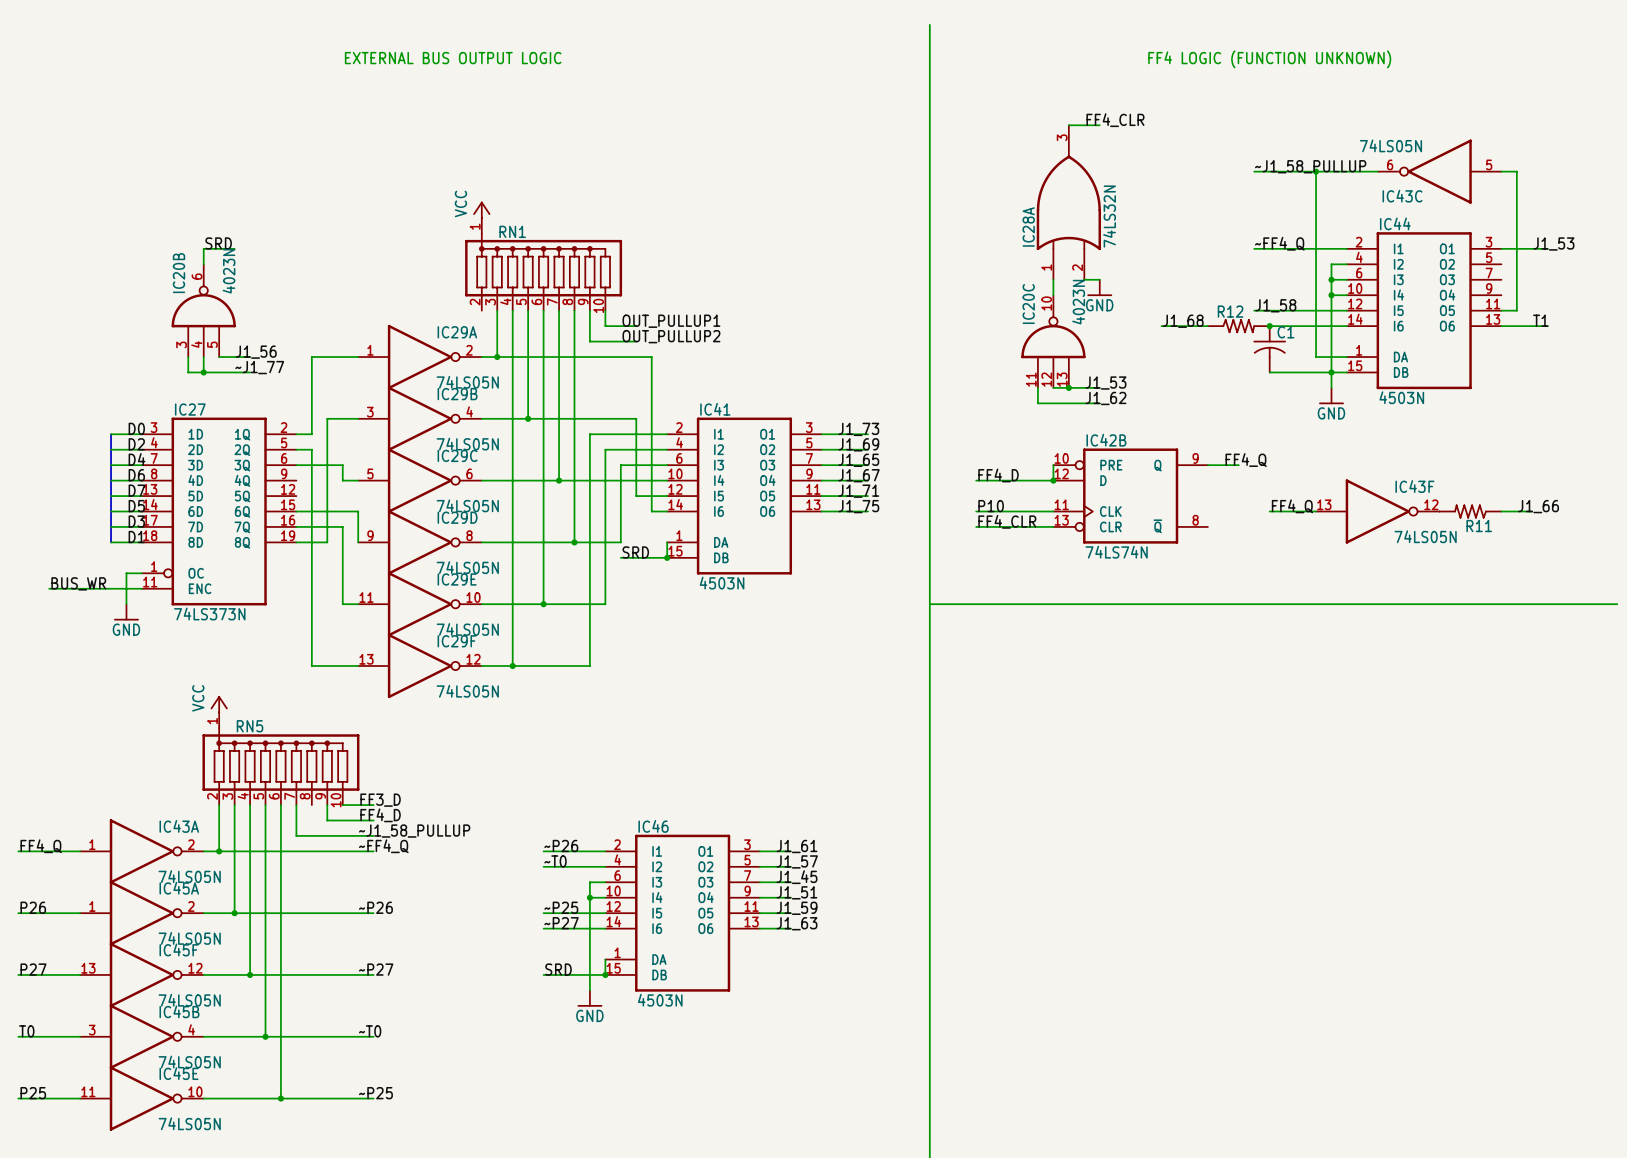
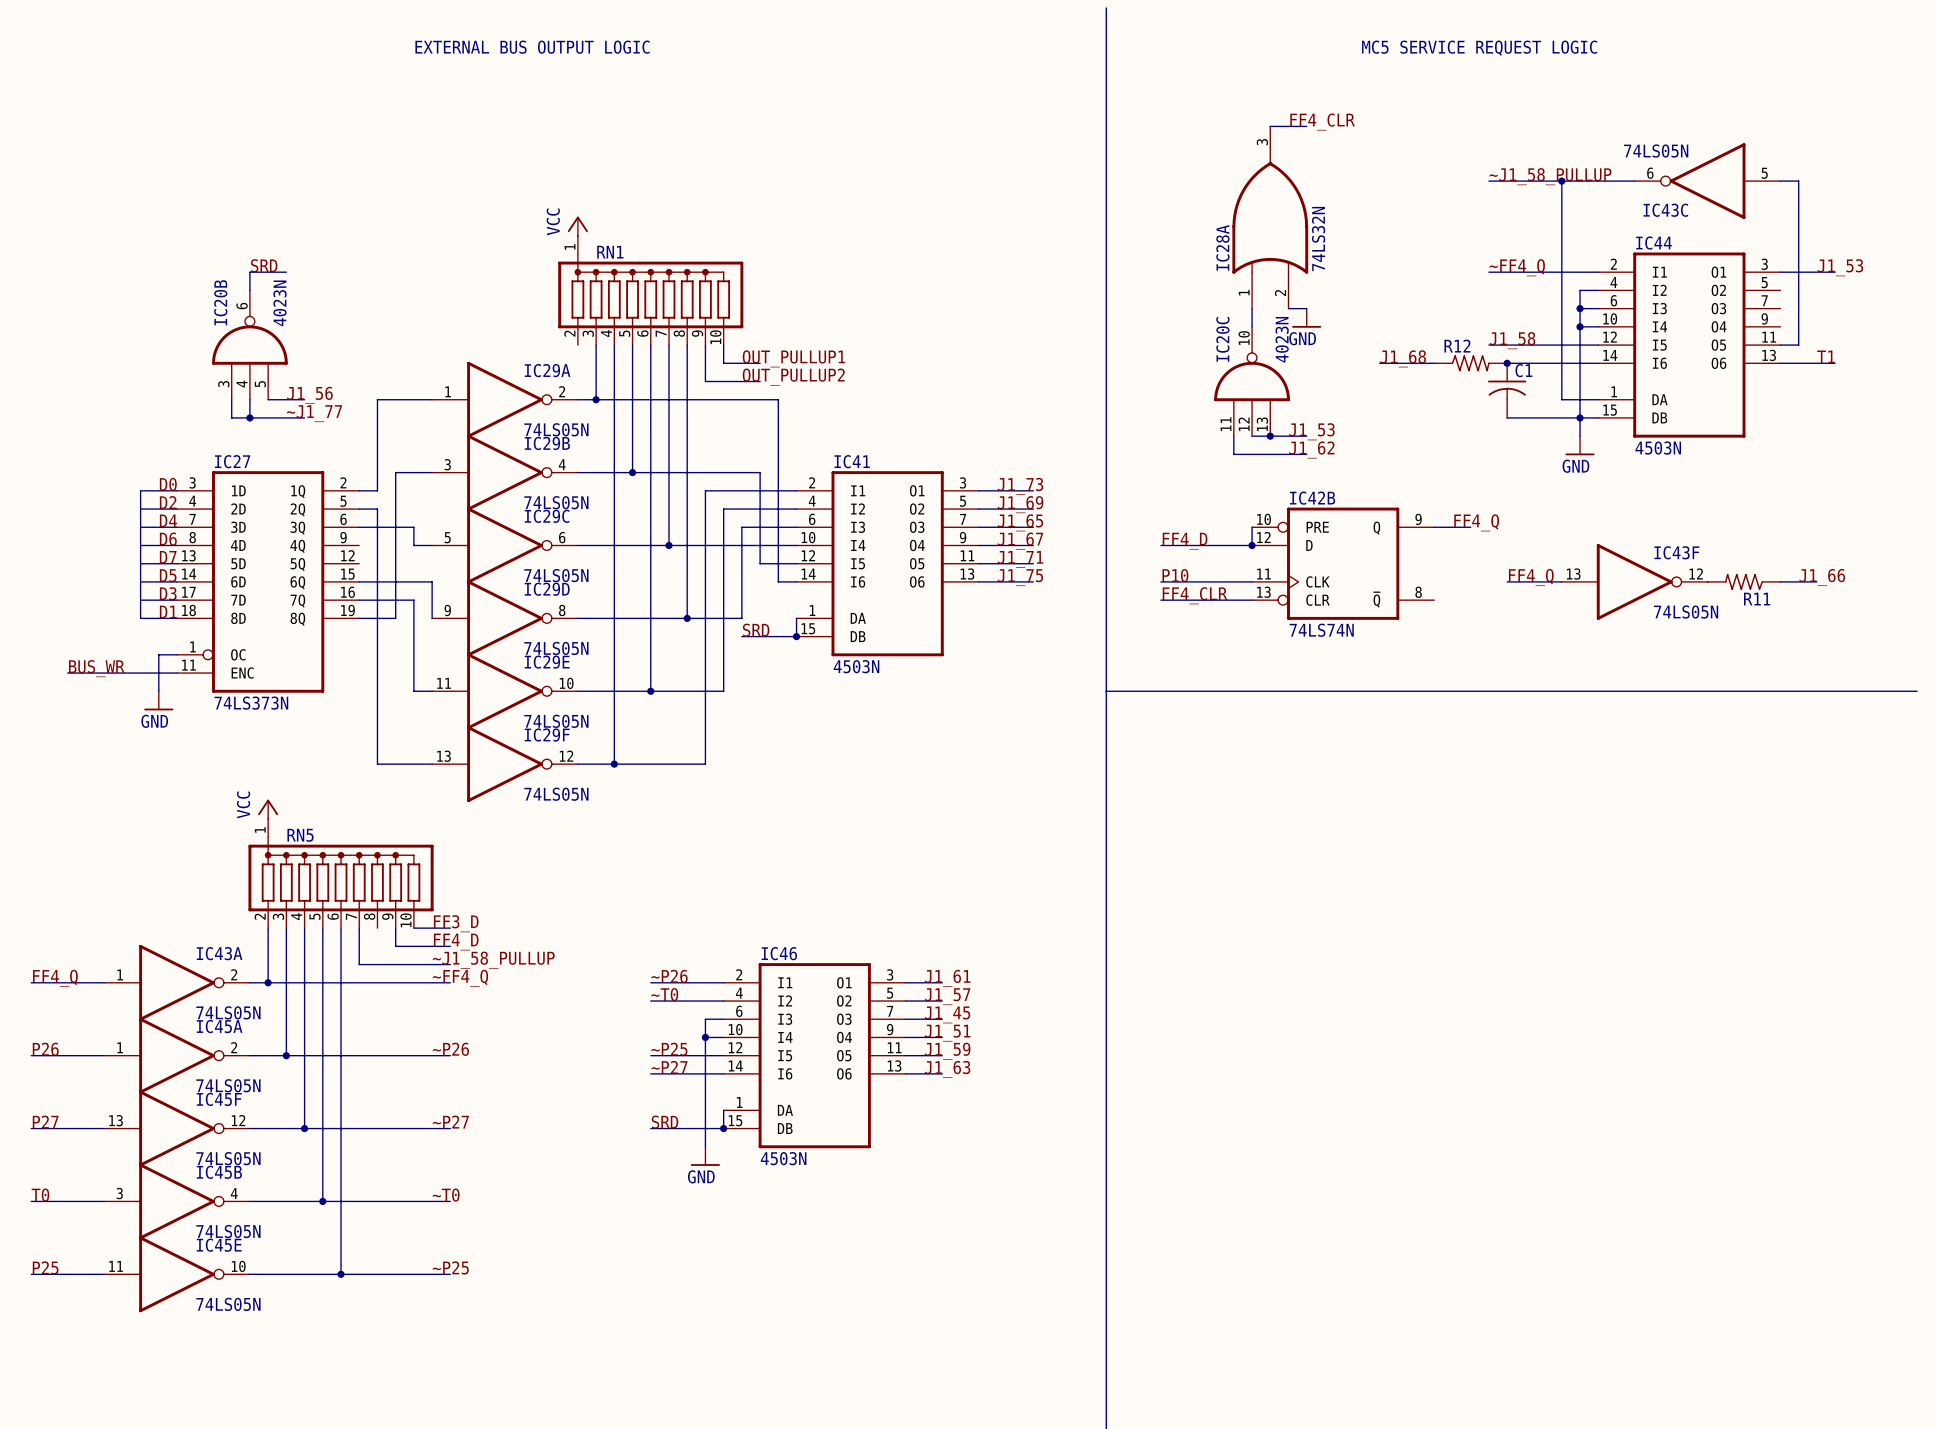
text: FF4 LOGIC (FUNCTION UNKNOWN) (1269, 59) -> MC5 SERVICE REQUEST LOGIC (1479, 48)

